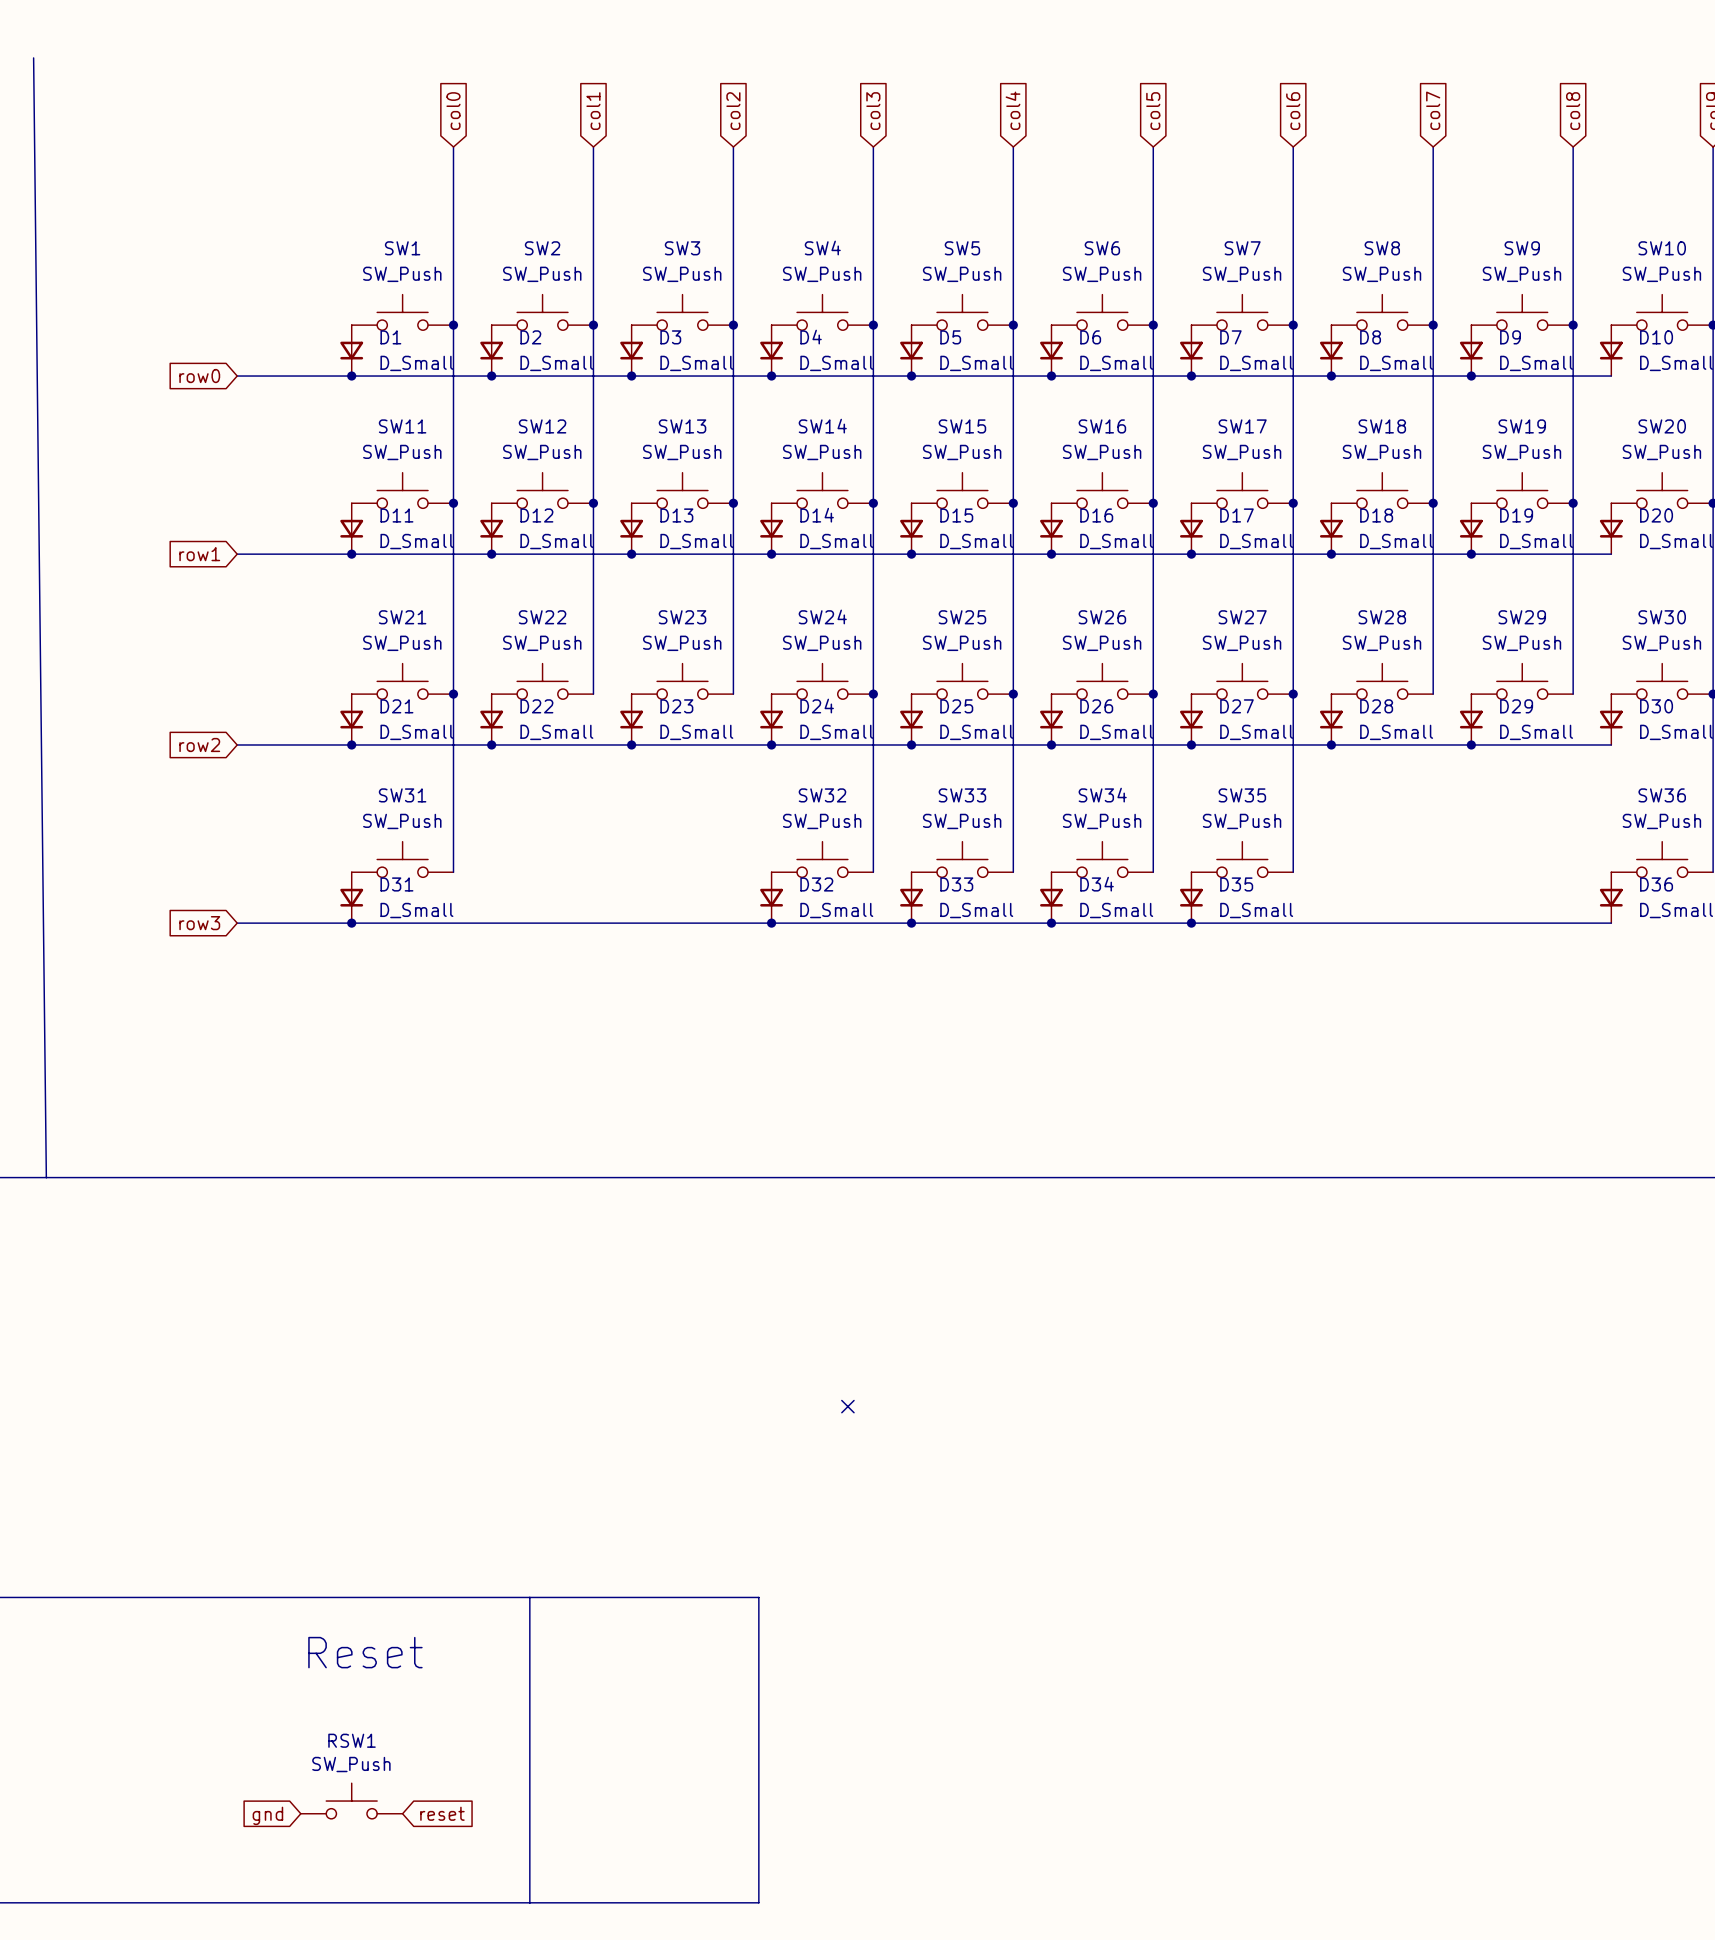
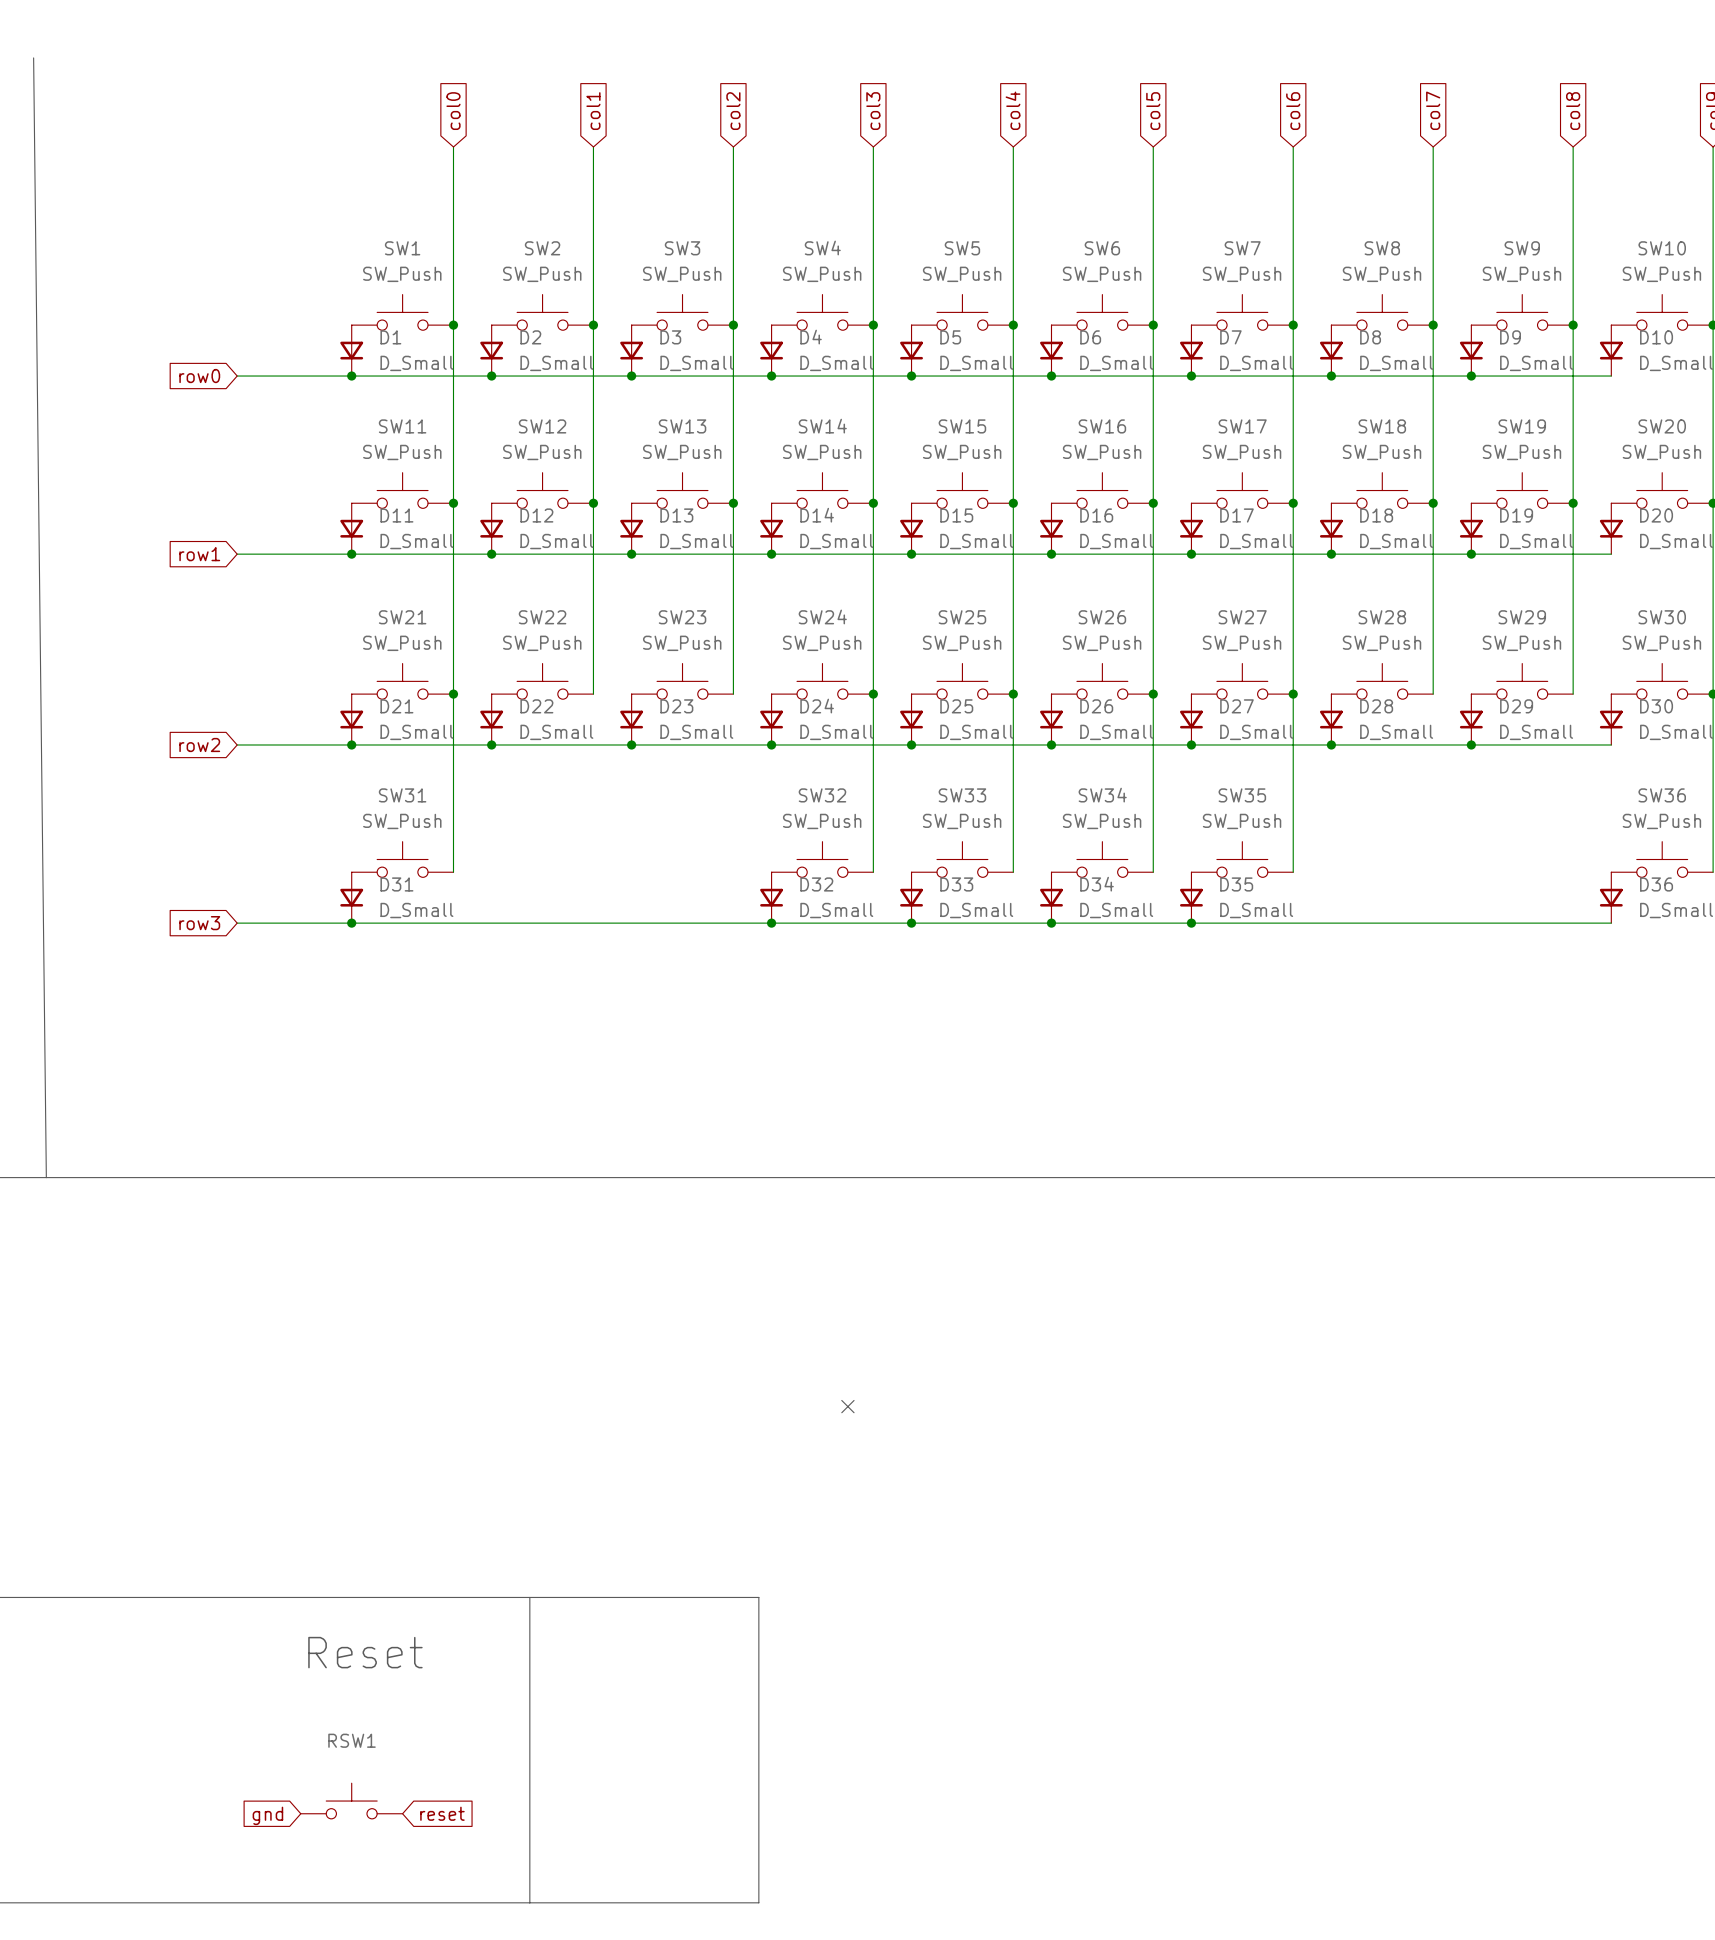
RSW1 value: SW_Push (351, 1764) -> none

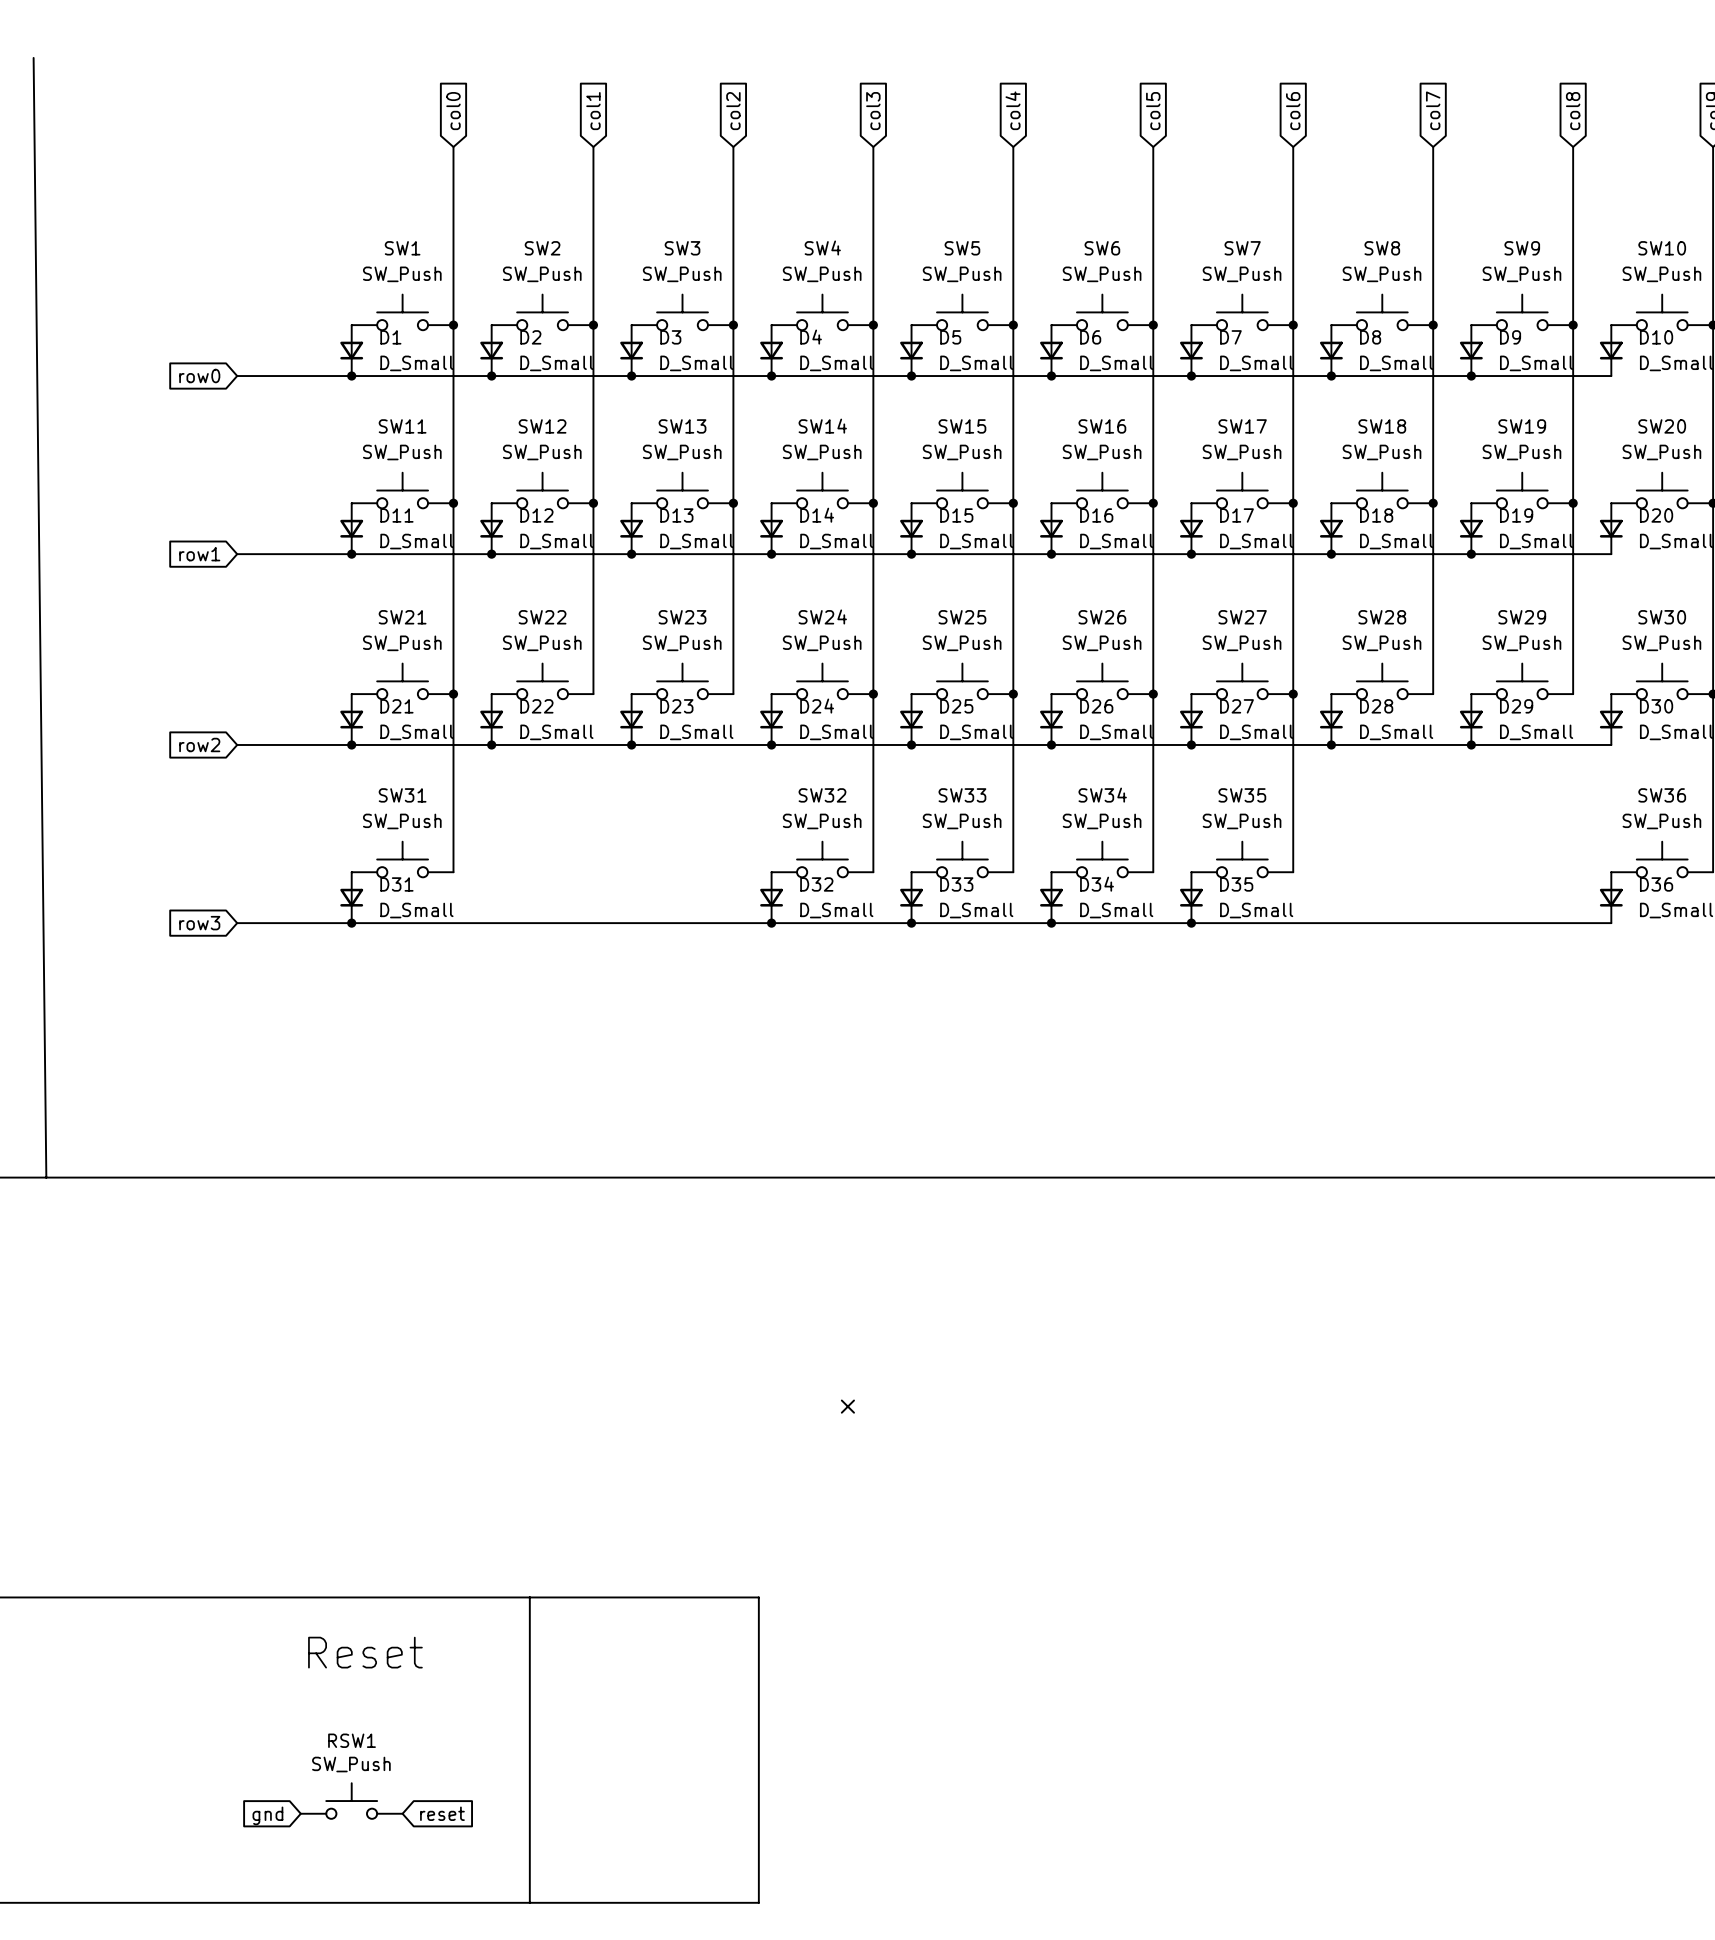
RSW1 value: none -> SW_Push (351, 1764)

